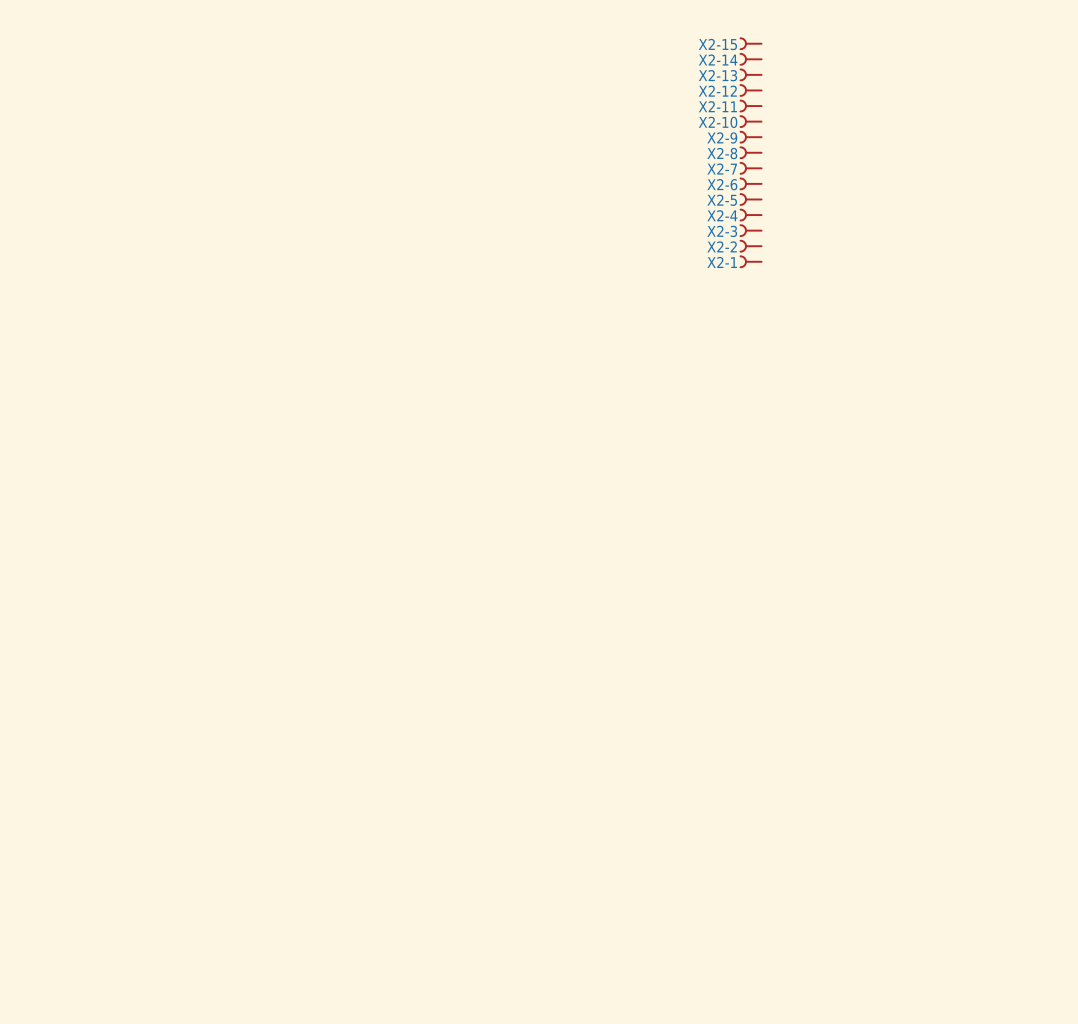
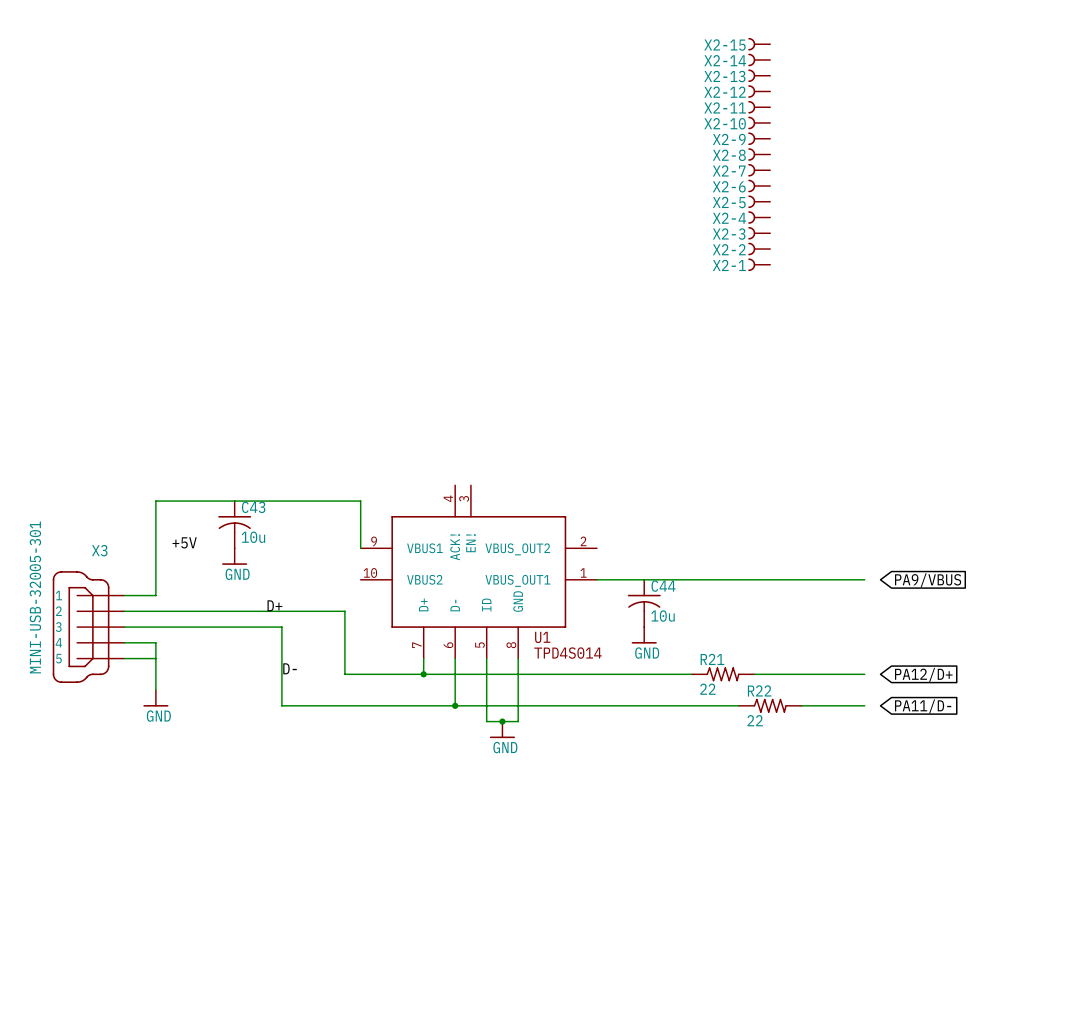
C43: none -> 10u (234, 524)
label: none -> +5V (184, 542)
wire: none -> (360, 548) (360, 501) (155, 501) (155, 595) (124, 595)
power symbol: none -> GND (234, 556)
U1: none -> TPD4S014 (478, 571)
wire: none -> (596, 579) (864, 579)
global label: none -> PA9/VBUS (928, 580)
C44: none -> 10u (644, 603)
label: none -> D+ (274, 605)
wire: none -> (124, 611) (344, 611) (344, 674) (691, 674)
X3: none -> MINI-USB-32005-301 (88, 627)
wire: none -> (124, 627) (281, 627) (281, 705) (738, 705)
power symbol: none -> GND (644, 635)
wire: none -> (124, 642) (155, 642) (155, 690)
wire: none -> (124, 658) (155, 658)
wire: none -> (423, 658) (423, 674)
wire: none -> (455, 658) (455, 705)
wire: none -> (486, 658) (486, 721) (518, 721) (518, 658)
label: none -> D- (290, 668)
junction: none -> (423, 674)
R21: none -> 22 (722, 674)
wire: none -> (754, 674) (864, 674)
global label: none -> PA12/D+ (923, 674)
power symbol: none -> GND (155, 698)
junction: none -> (455, 705)
R22: none -> 22 (770, 705)
wire: none -> (801, 705) (864, 705)
global label: none -> PA11/D- (923, 706)
junction: none -> (502, 721)
power symbol: none -> GND (502, 729)

